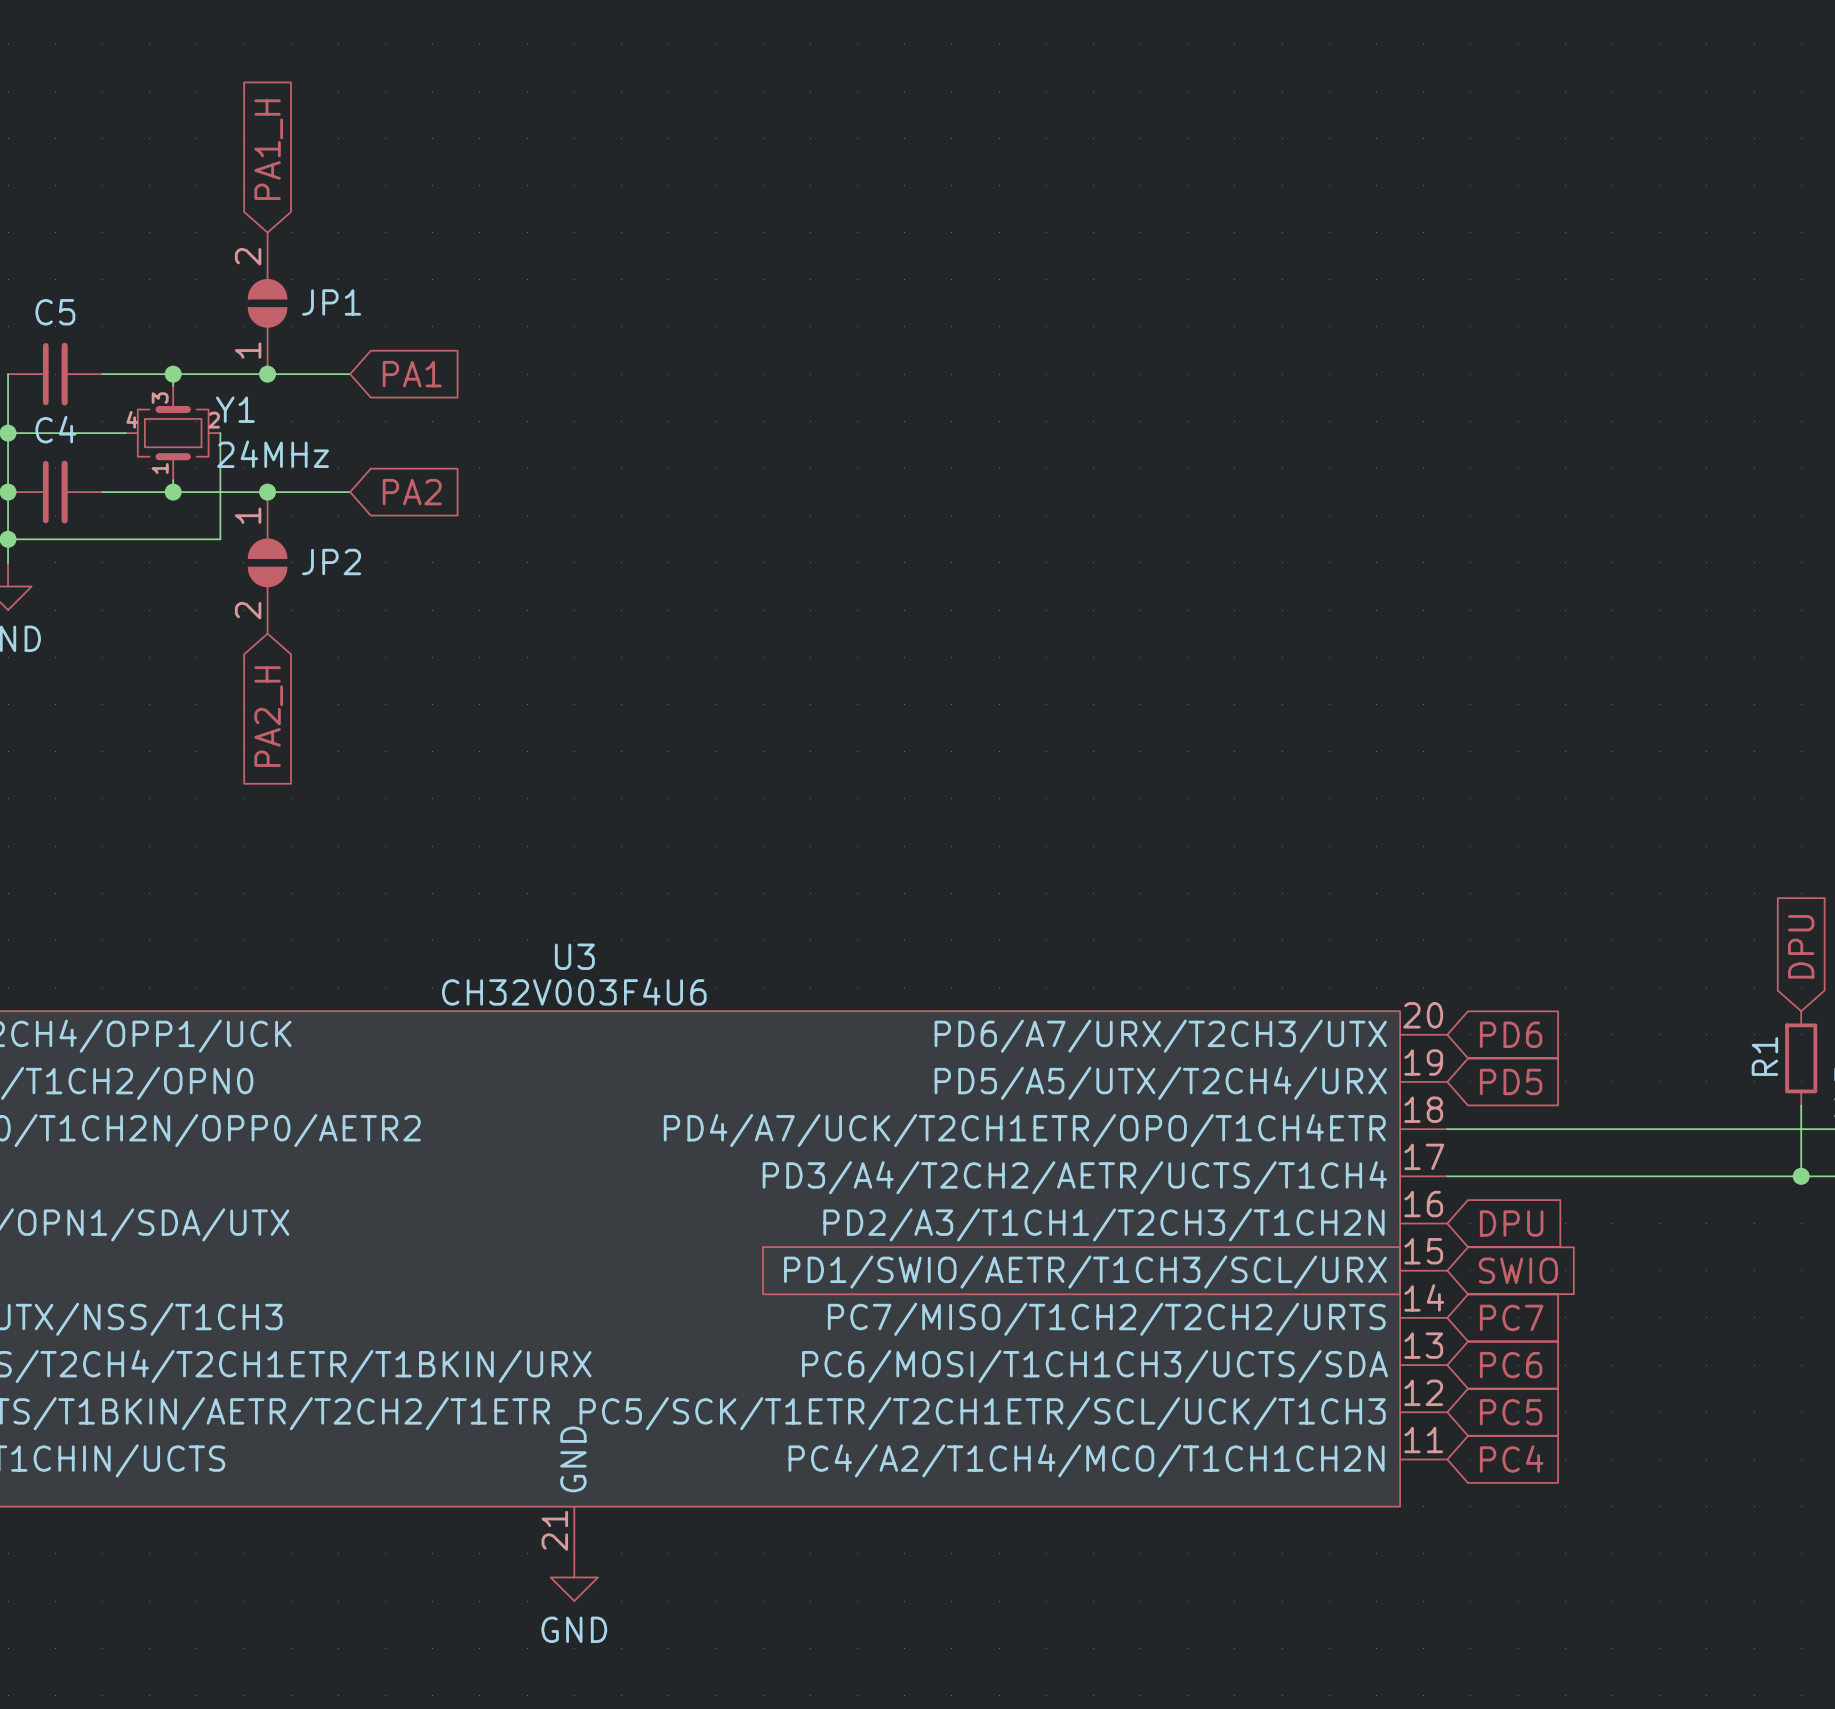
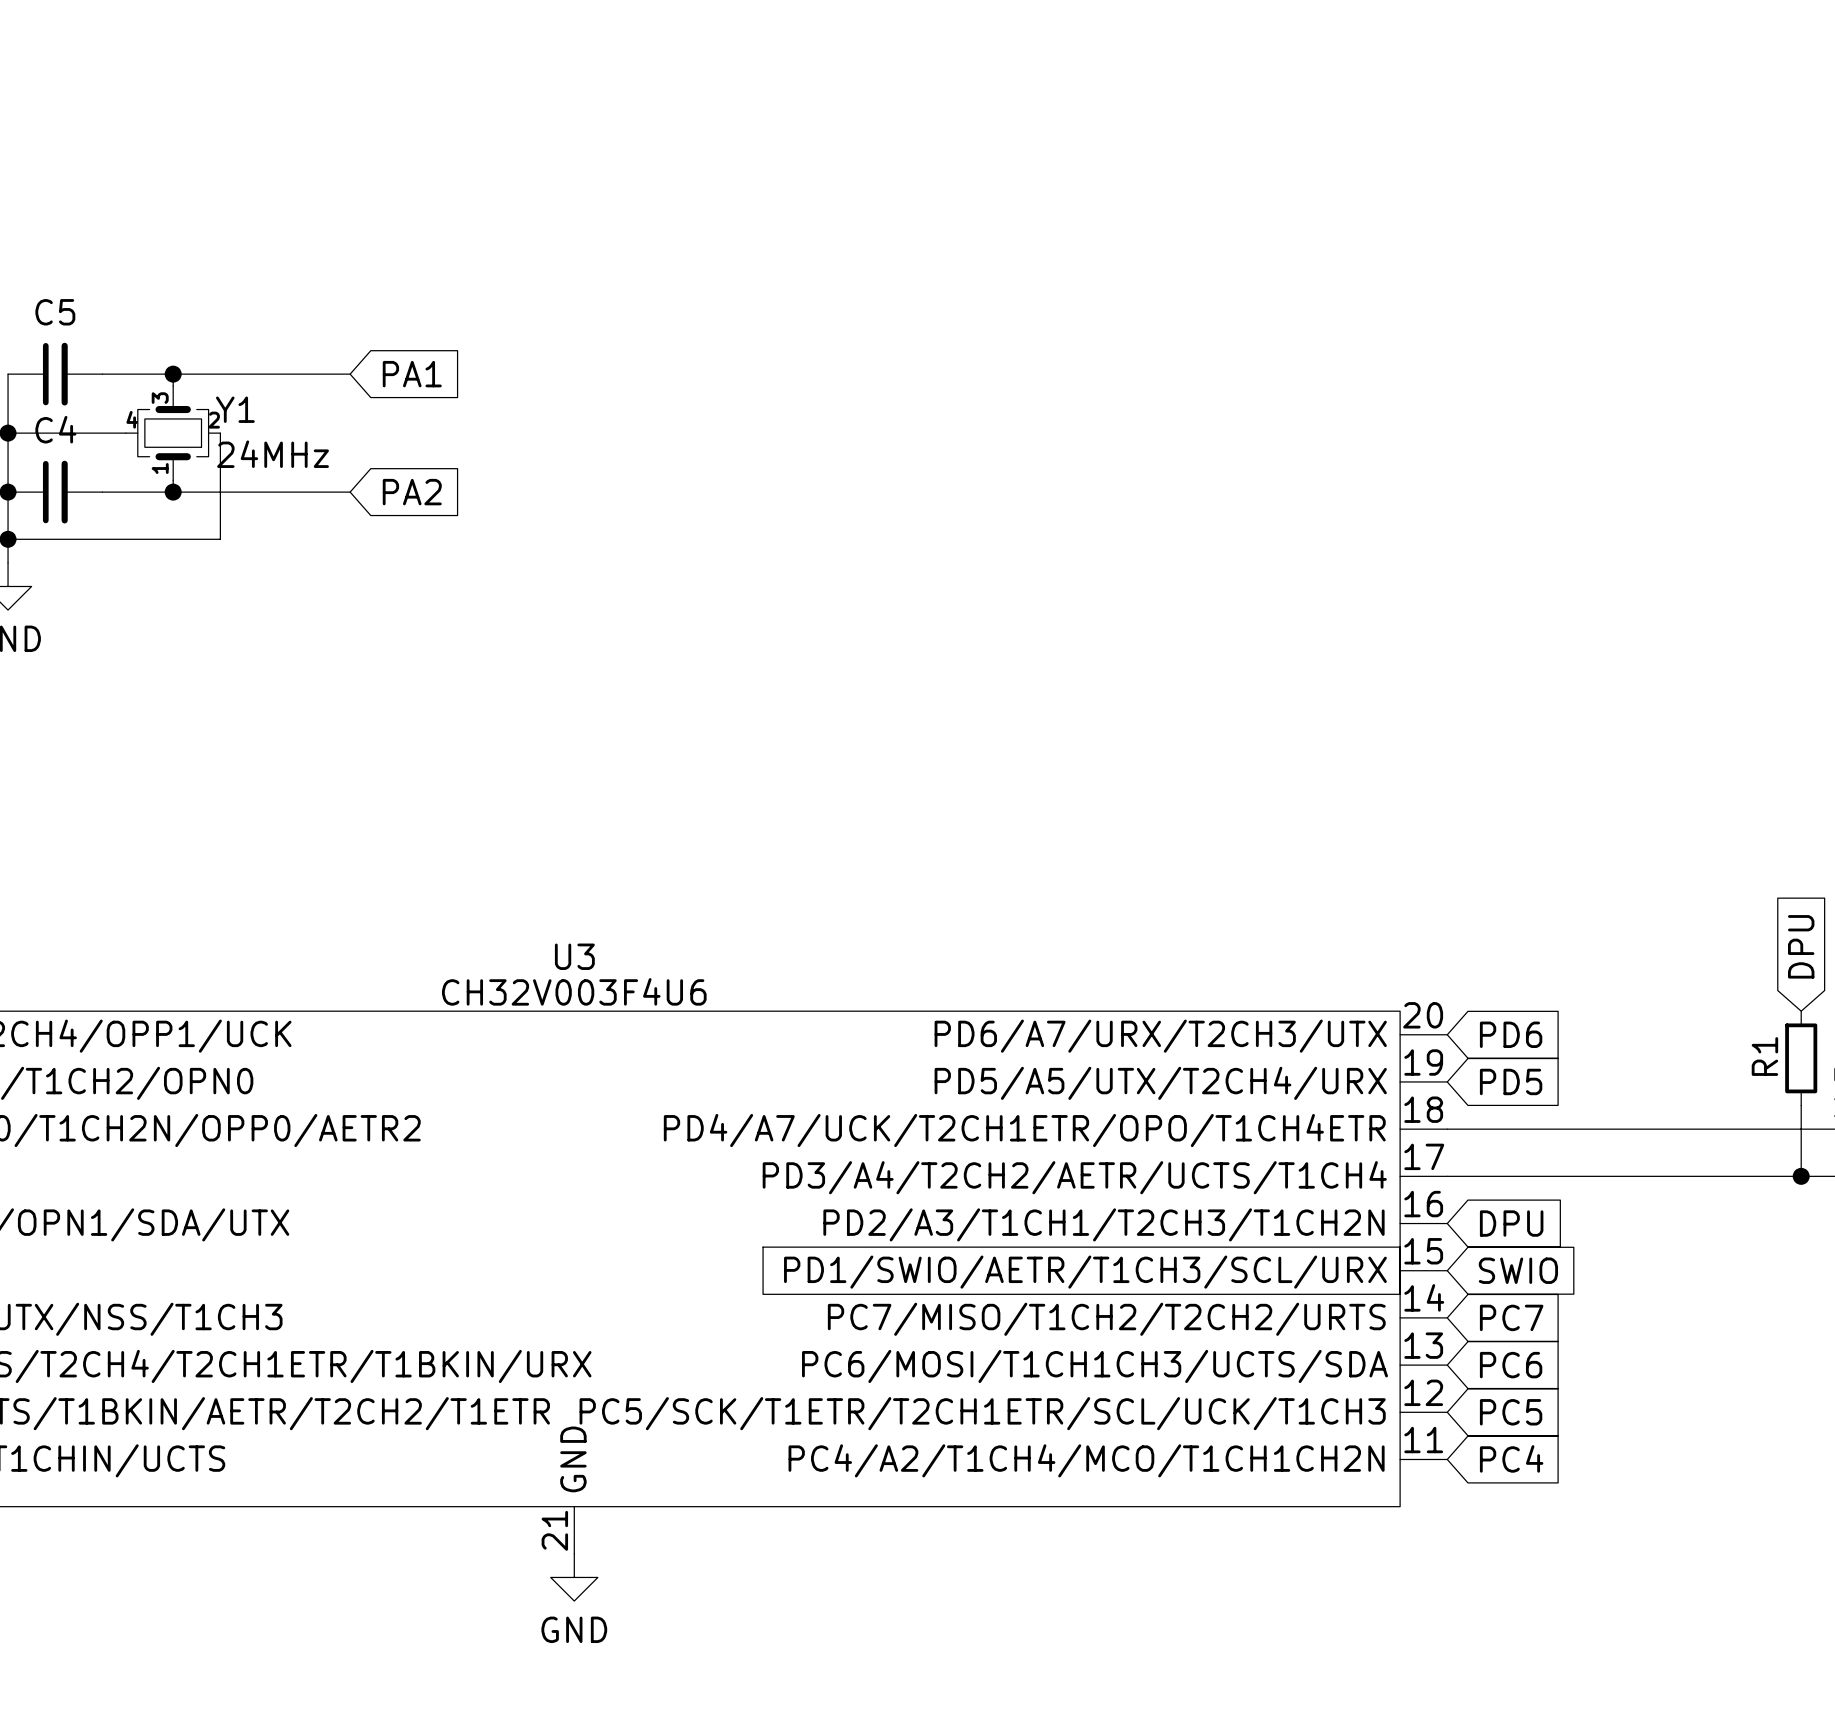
global label: PA1_H (268, 149) -> none
JP1: (267, 303) -> none
junction: (267, 374) -> none
junction: (267, 492) -> none
JP2: (267, 562) -> none
global label: PA2_H (268, 716) -> none

